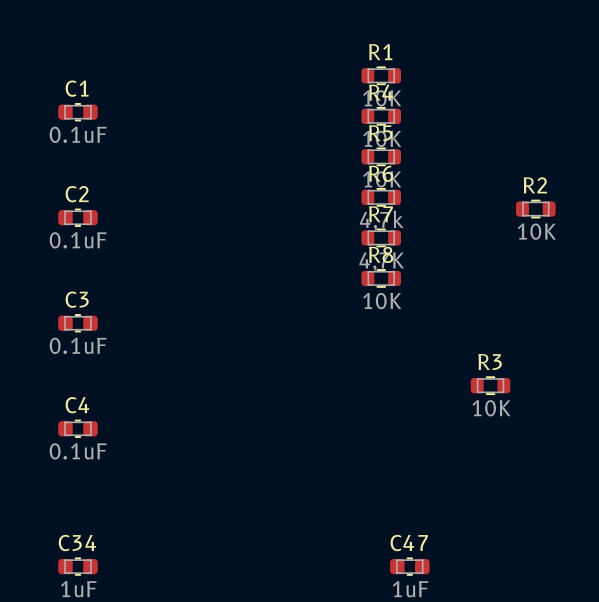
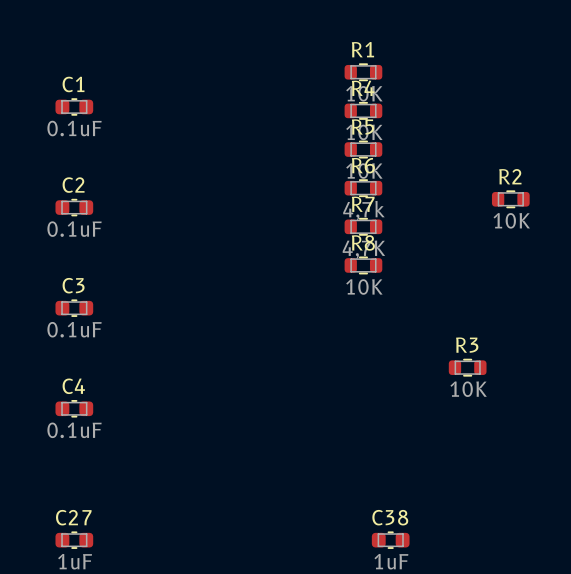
C34 name: C34 (77, 543) -> C27 (73, 517)
C47 name: C47 (409, 543) -> C38 (390, 517)

